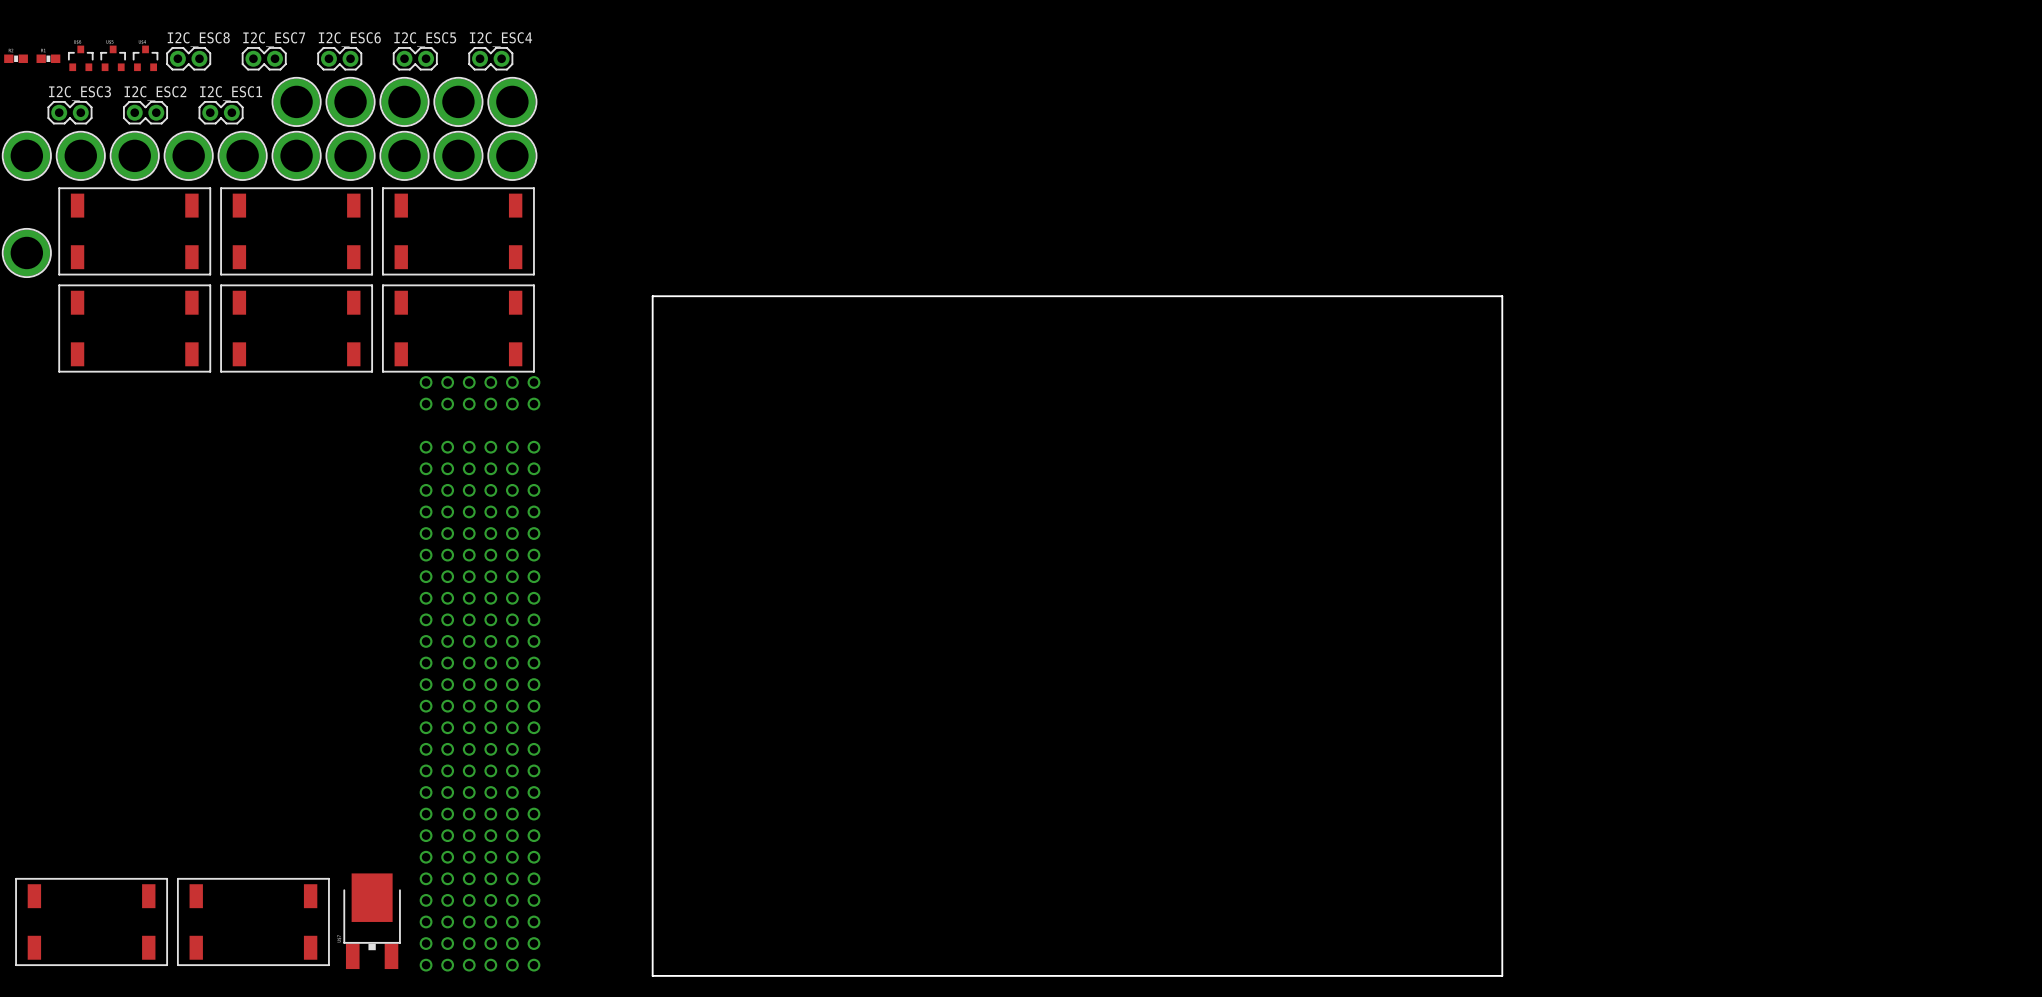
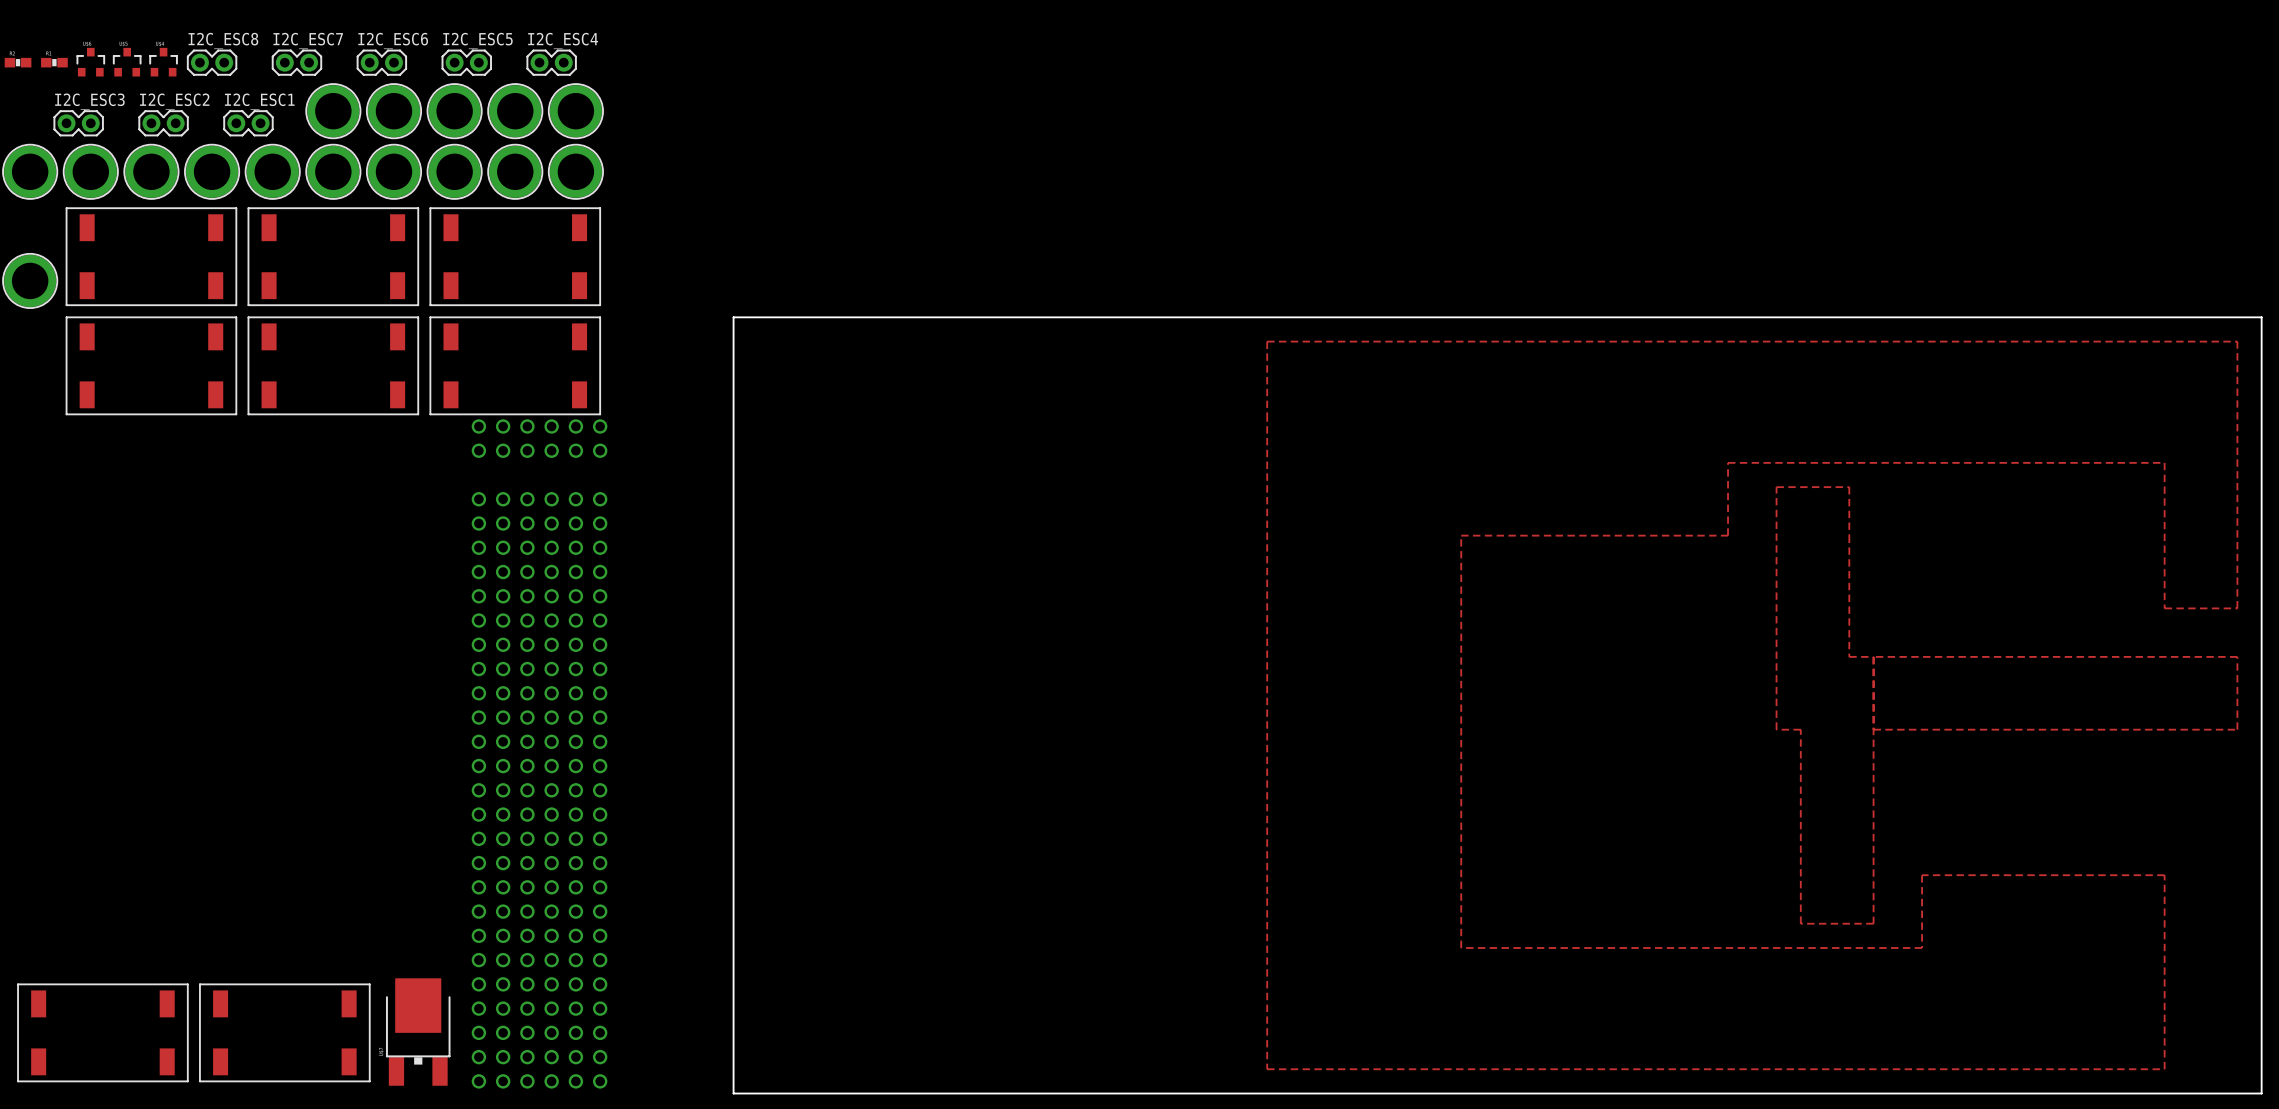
board edge: (652, 296) (1502, 296) (1502, 975) -> (733, 329) (733, 317) (2261, 317) (2261, 1093) (1688, 1093)
zone outline: none -> (1267, 341) (1267, 1069) (2164, 1069) (2164, 875) (1922, 875) (1922, 947) (1461, 947) (1461, 535) (1728, 535) (1728, 462) (2164, 462) (2164, 608) (2237, 608) (2237, 341) (1267, 341)
zone outline: none -> (1873, 656) (1873, 923) (1800, 923) (1800, 729) (1776, 729) (1776, 487) (1849, 487) (1849, 656) (2237, 656) (2237, 729) (1873, 729)

